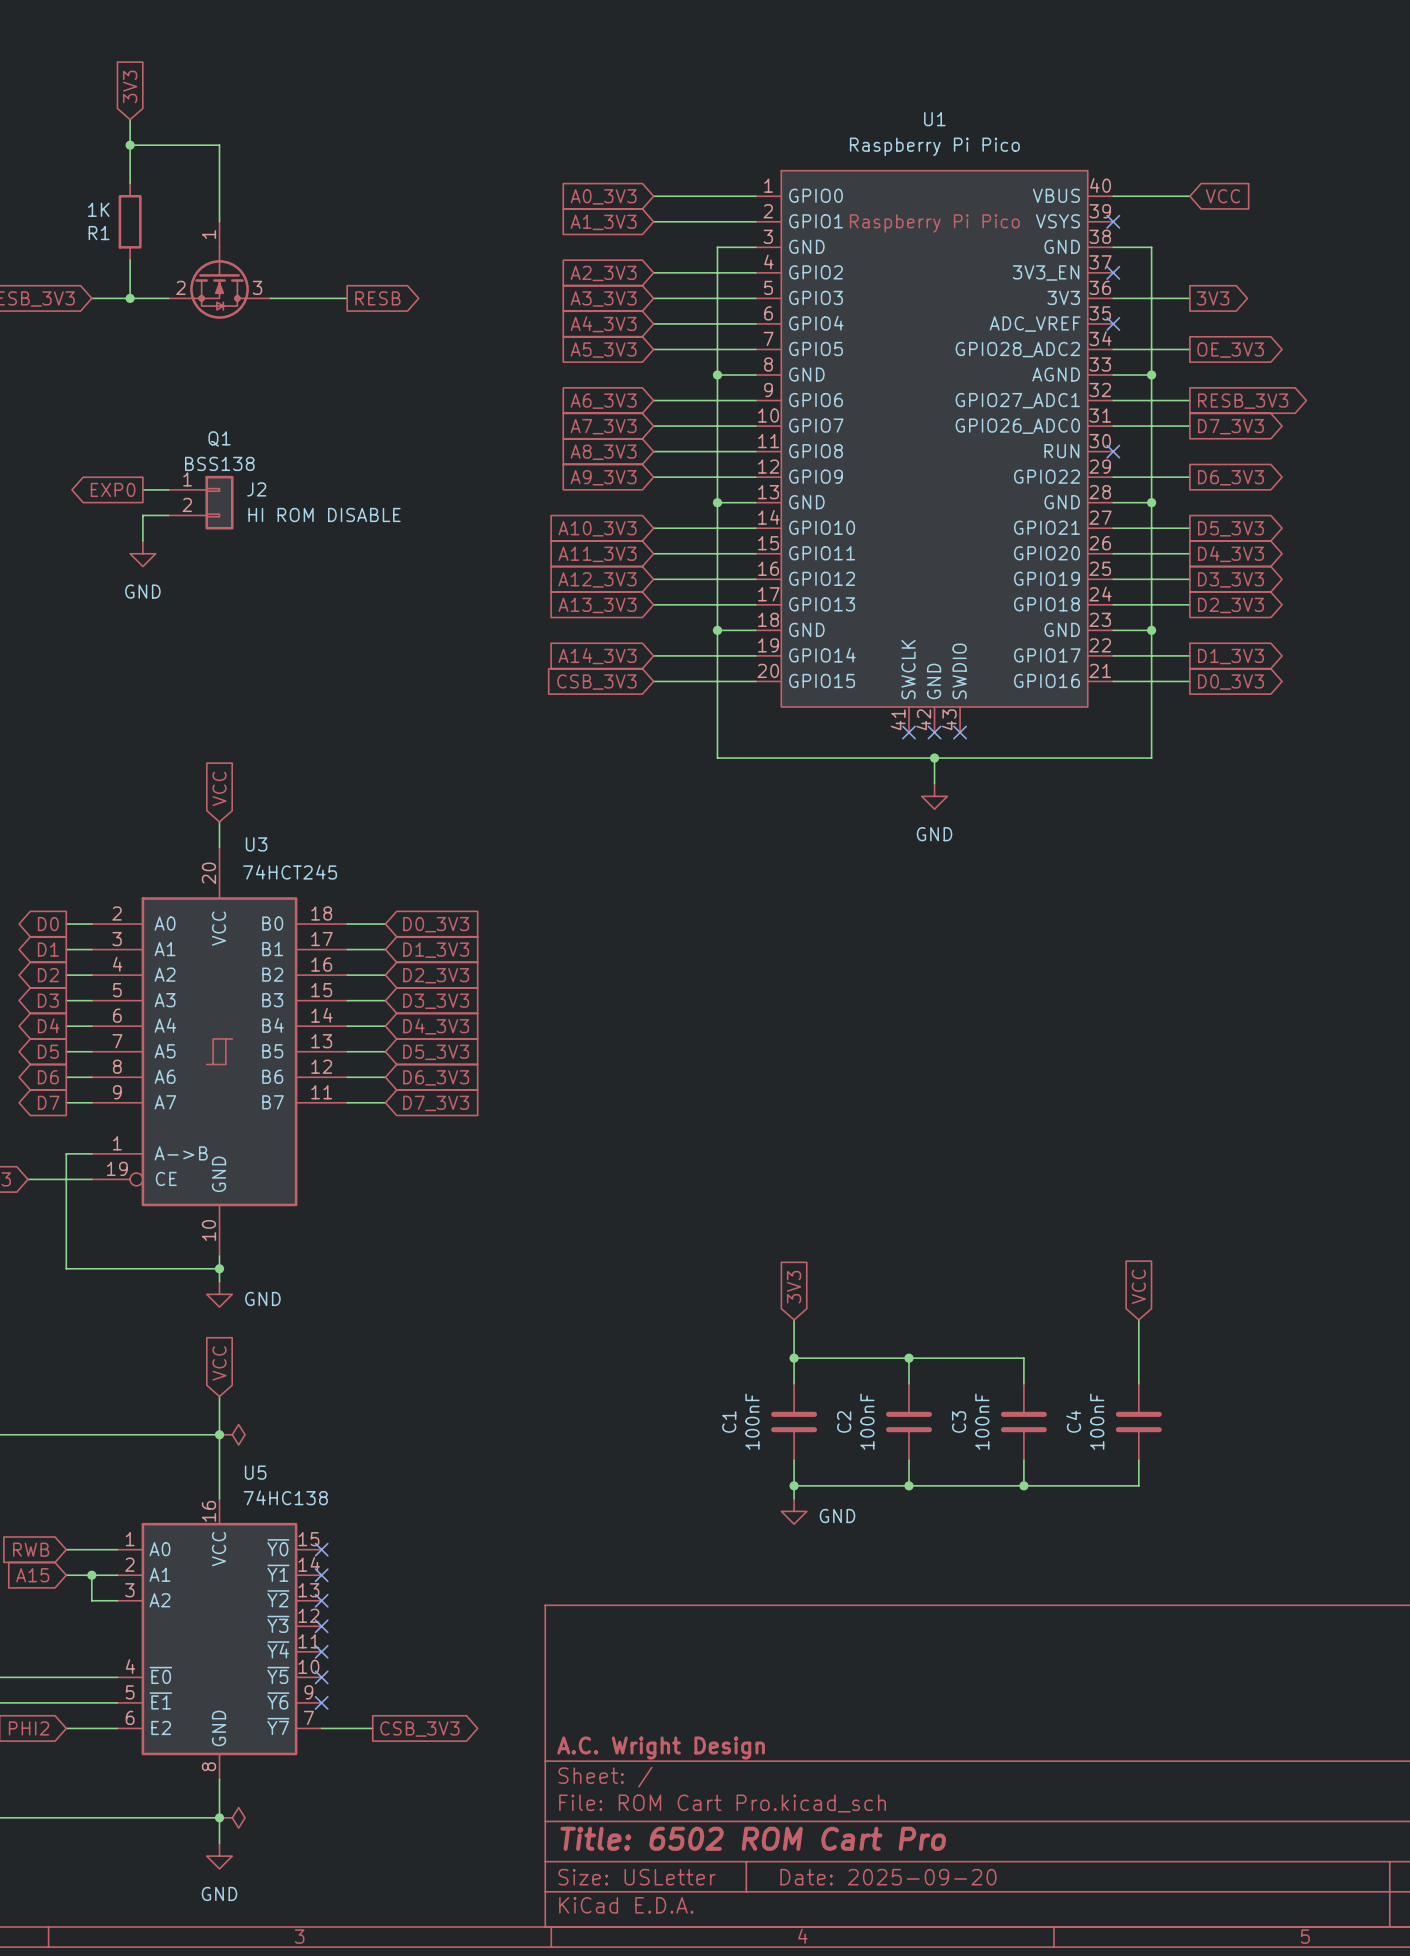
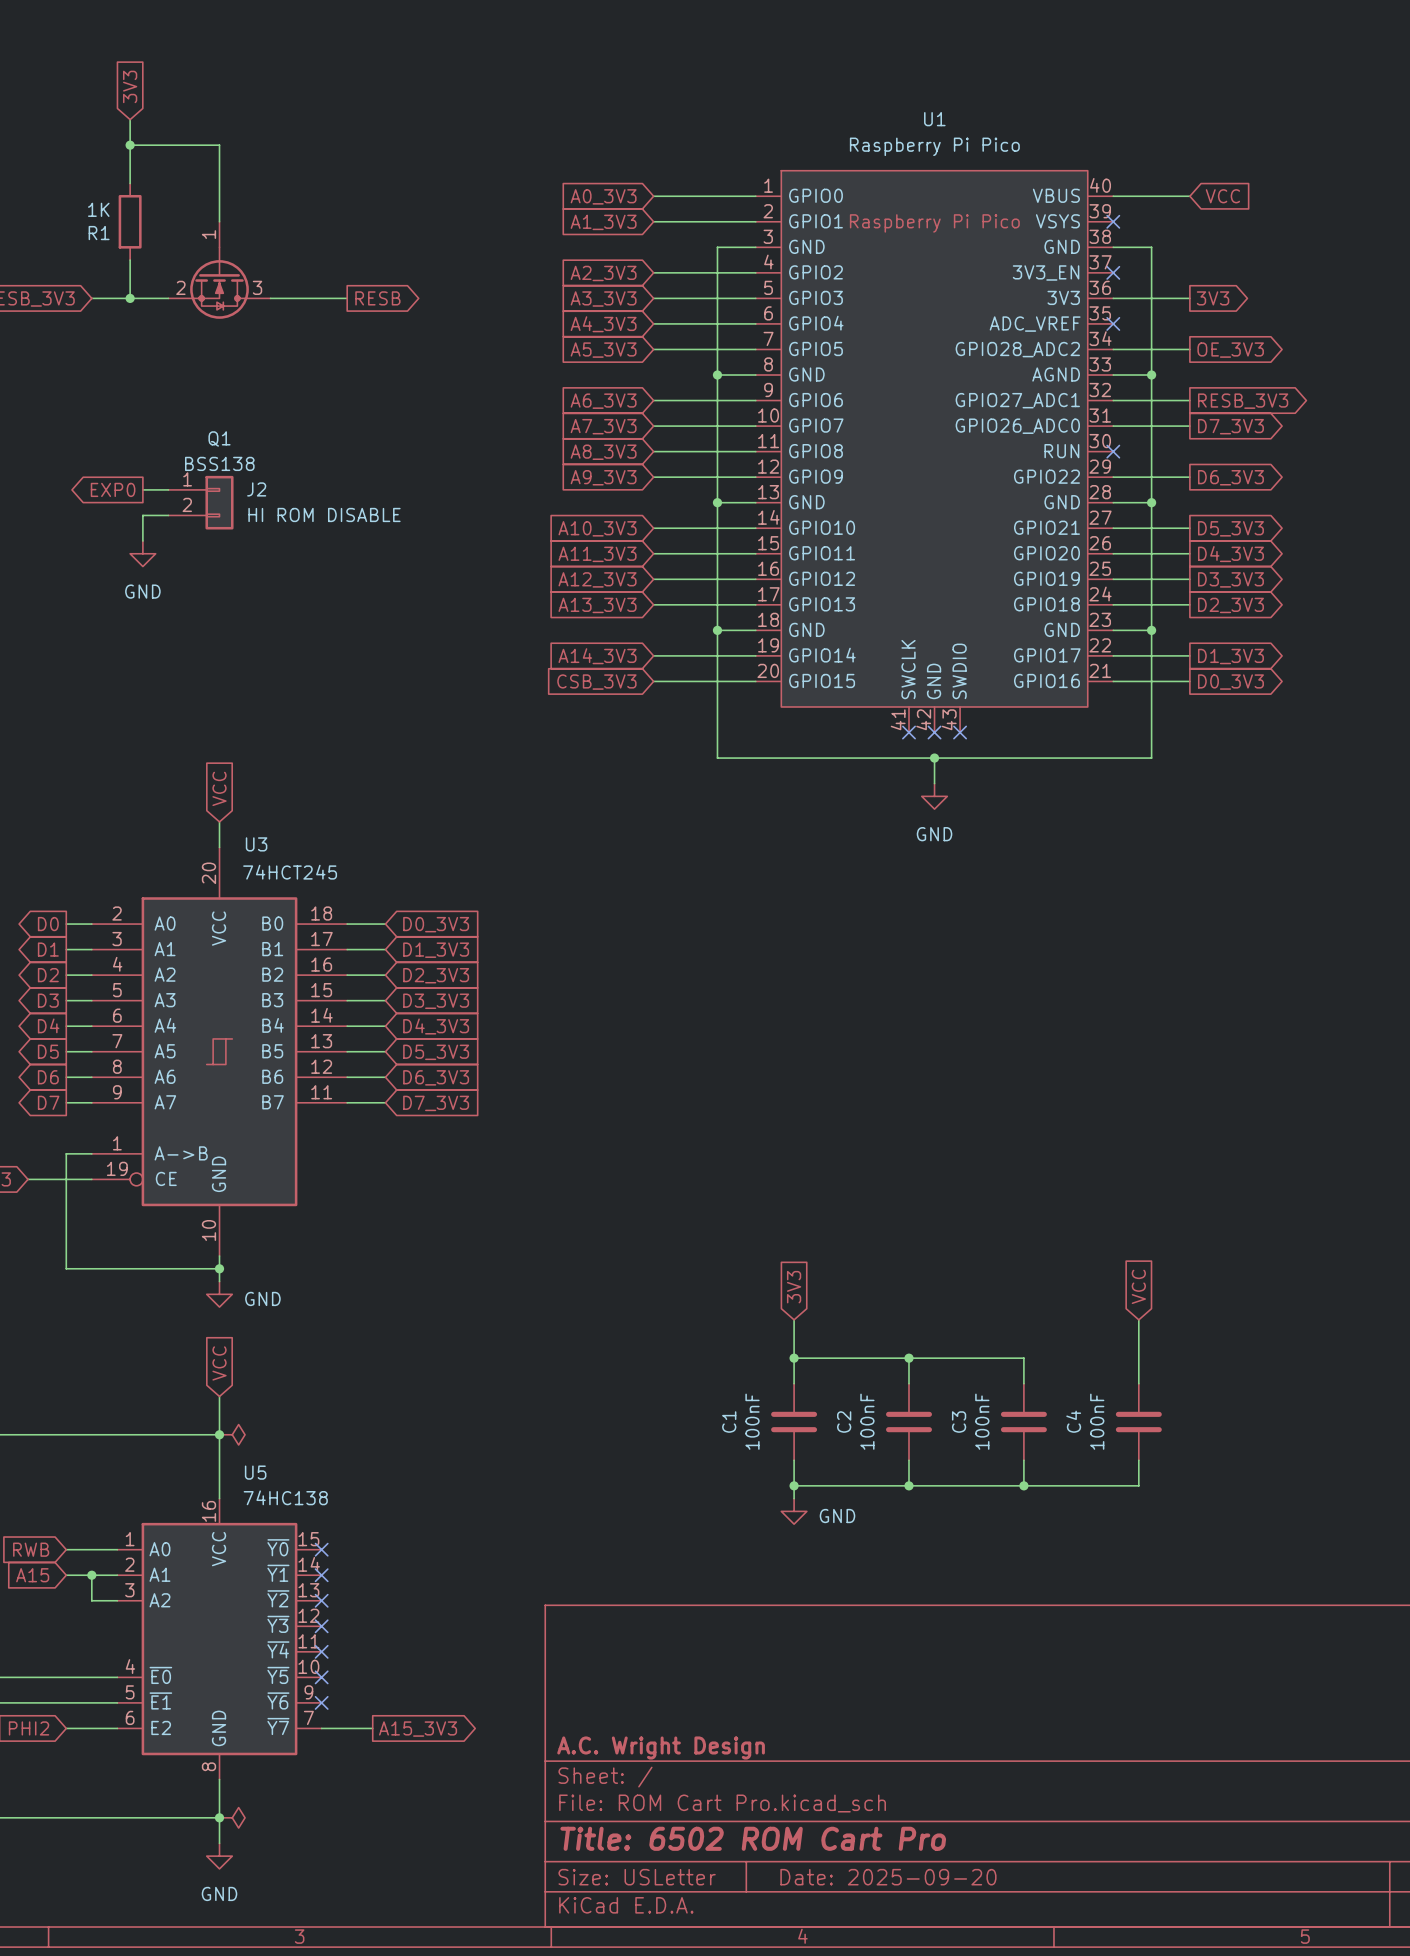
global label: CSB_3V3 (419, 1729) -> A15_3V3 (418, 1729)

